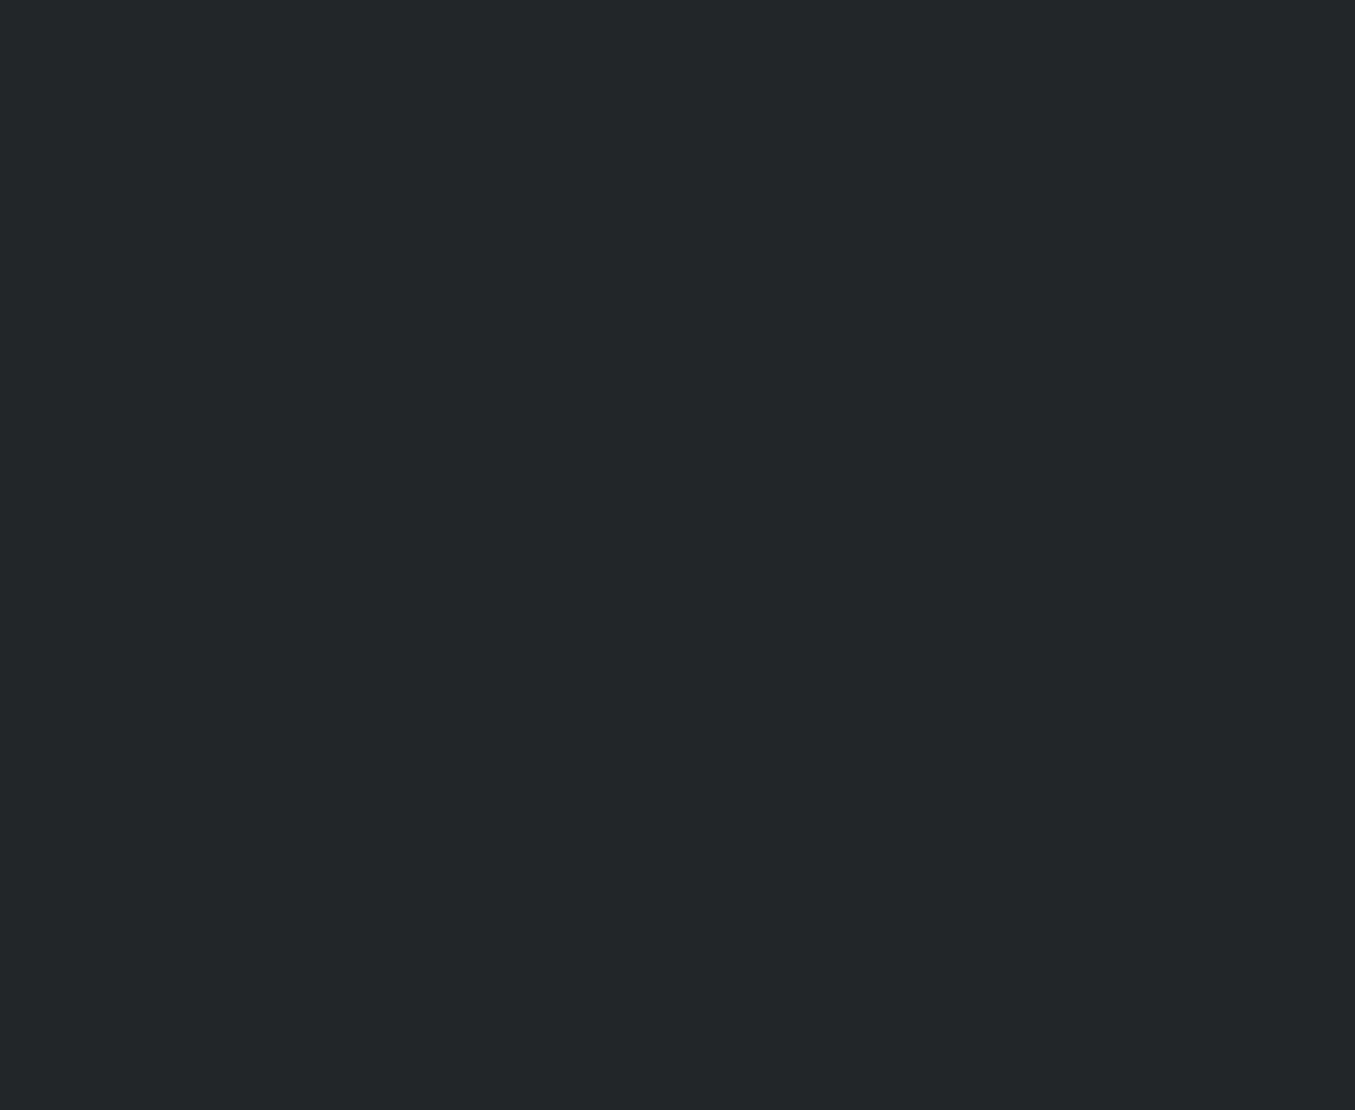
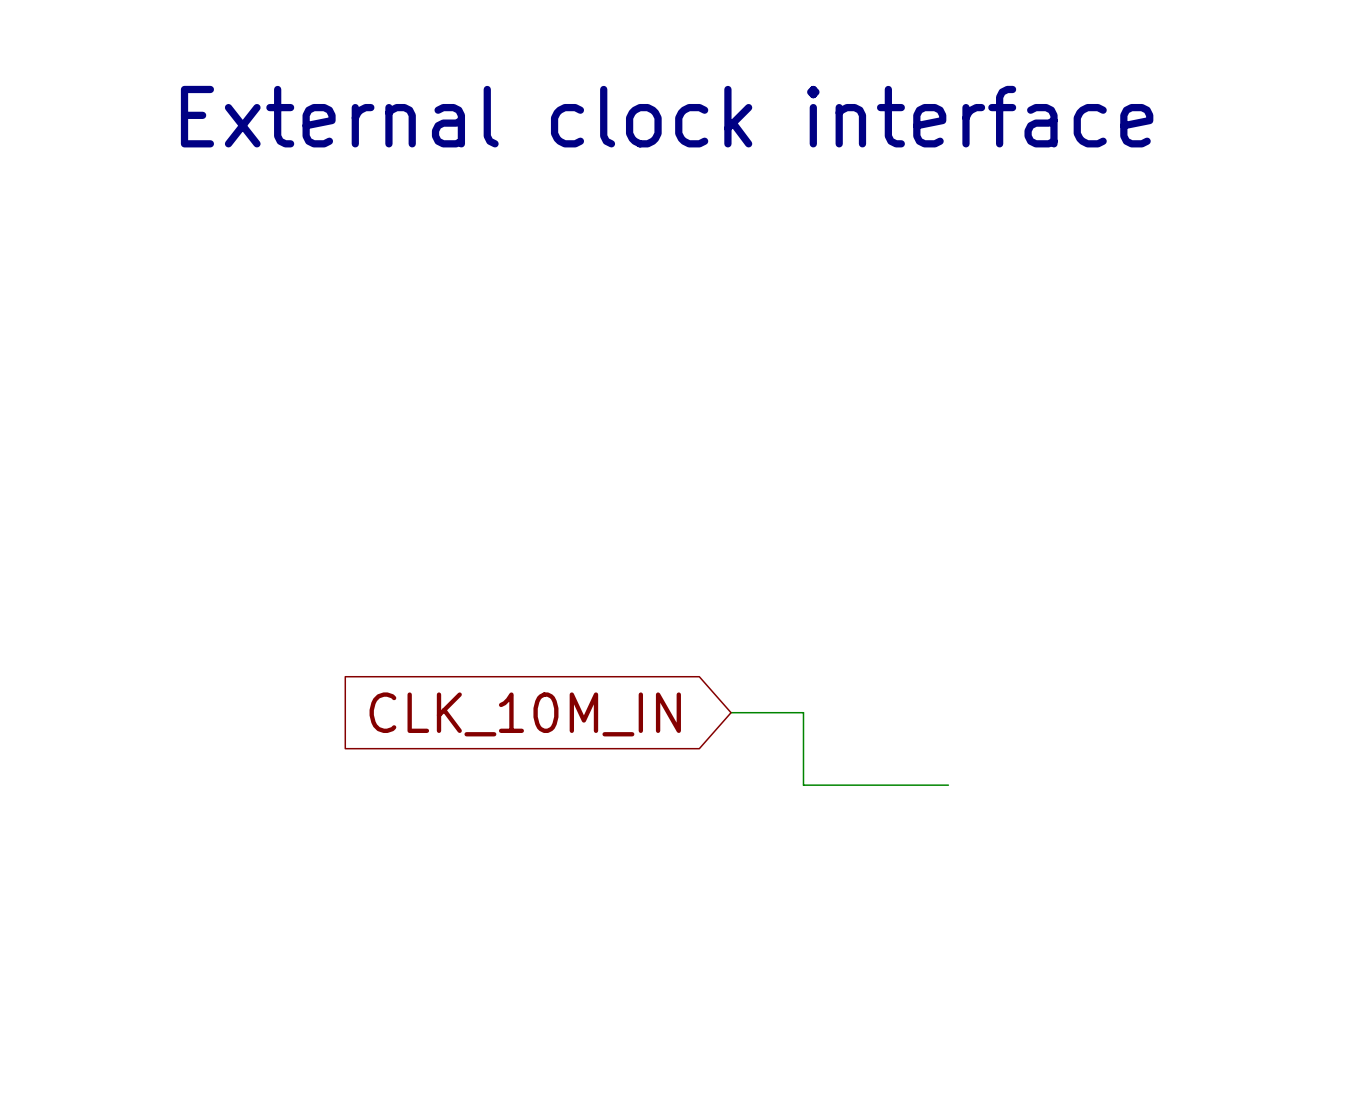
text: none -> External clock interface (667, 116)
wire: none -> (731, 712) (803, 712) (803, 785) (948, 785)
global label: none -> CLK_10M_IN (525, 714)

